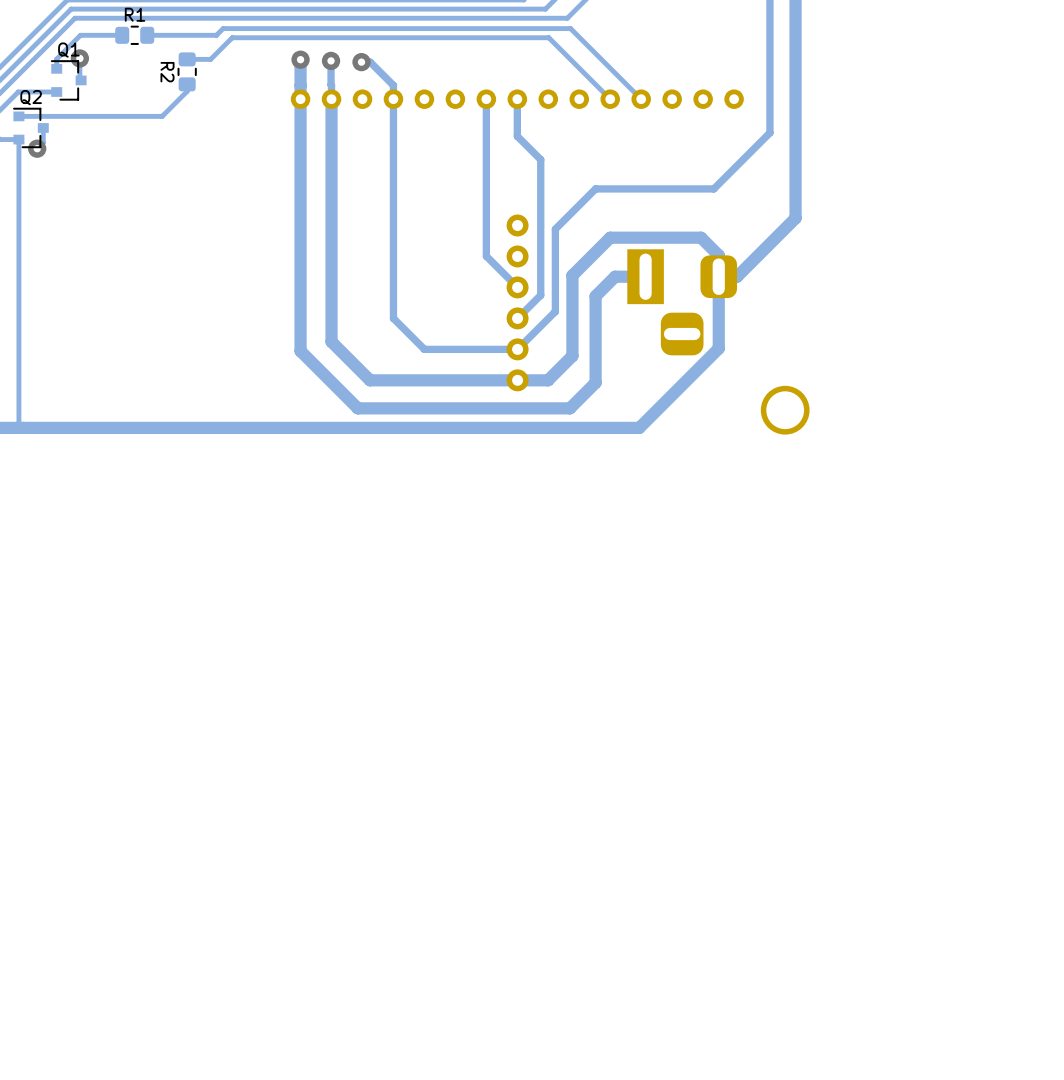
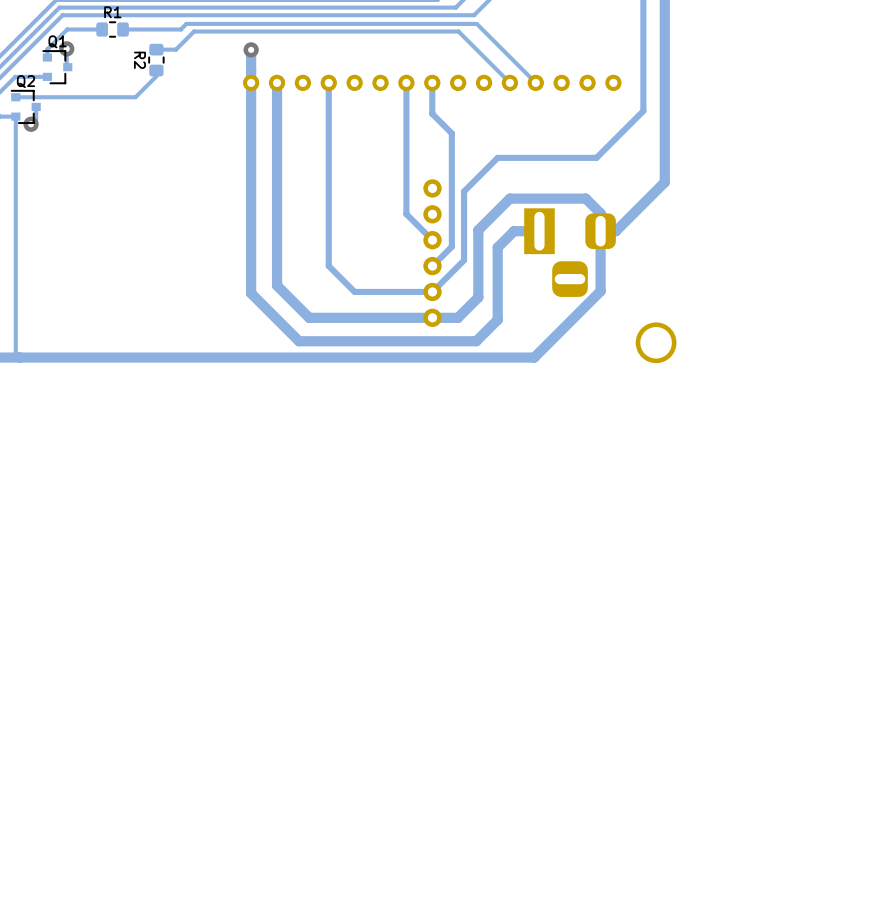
track: (331, 60) (331, 99) -> none
via: (331, 60) -> none
track: (361, 62) (370, 62) (393, 85) (393, 99) -> none
via: (361, 62) -> none

